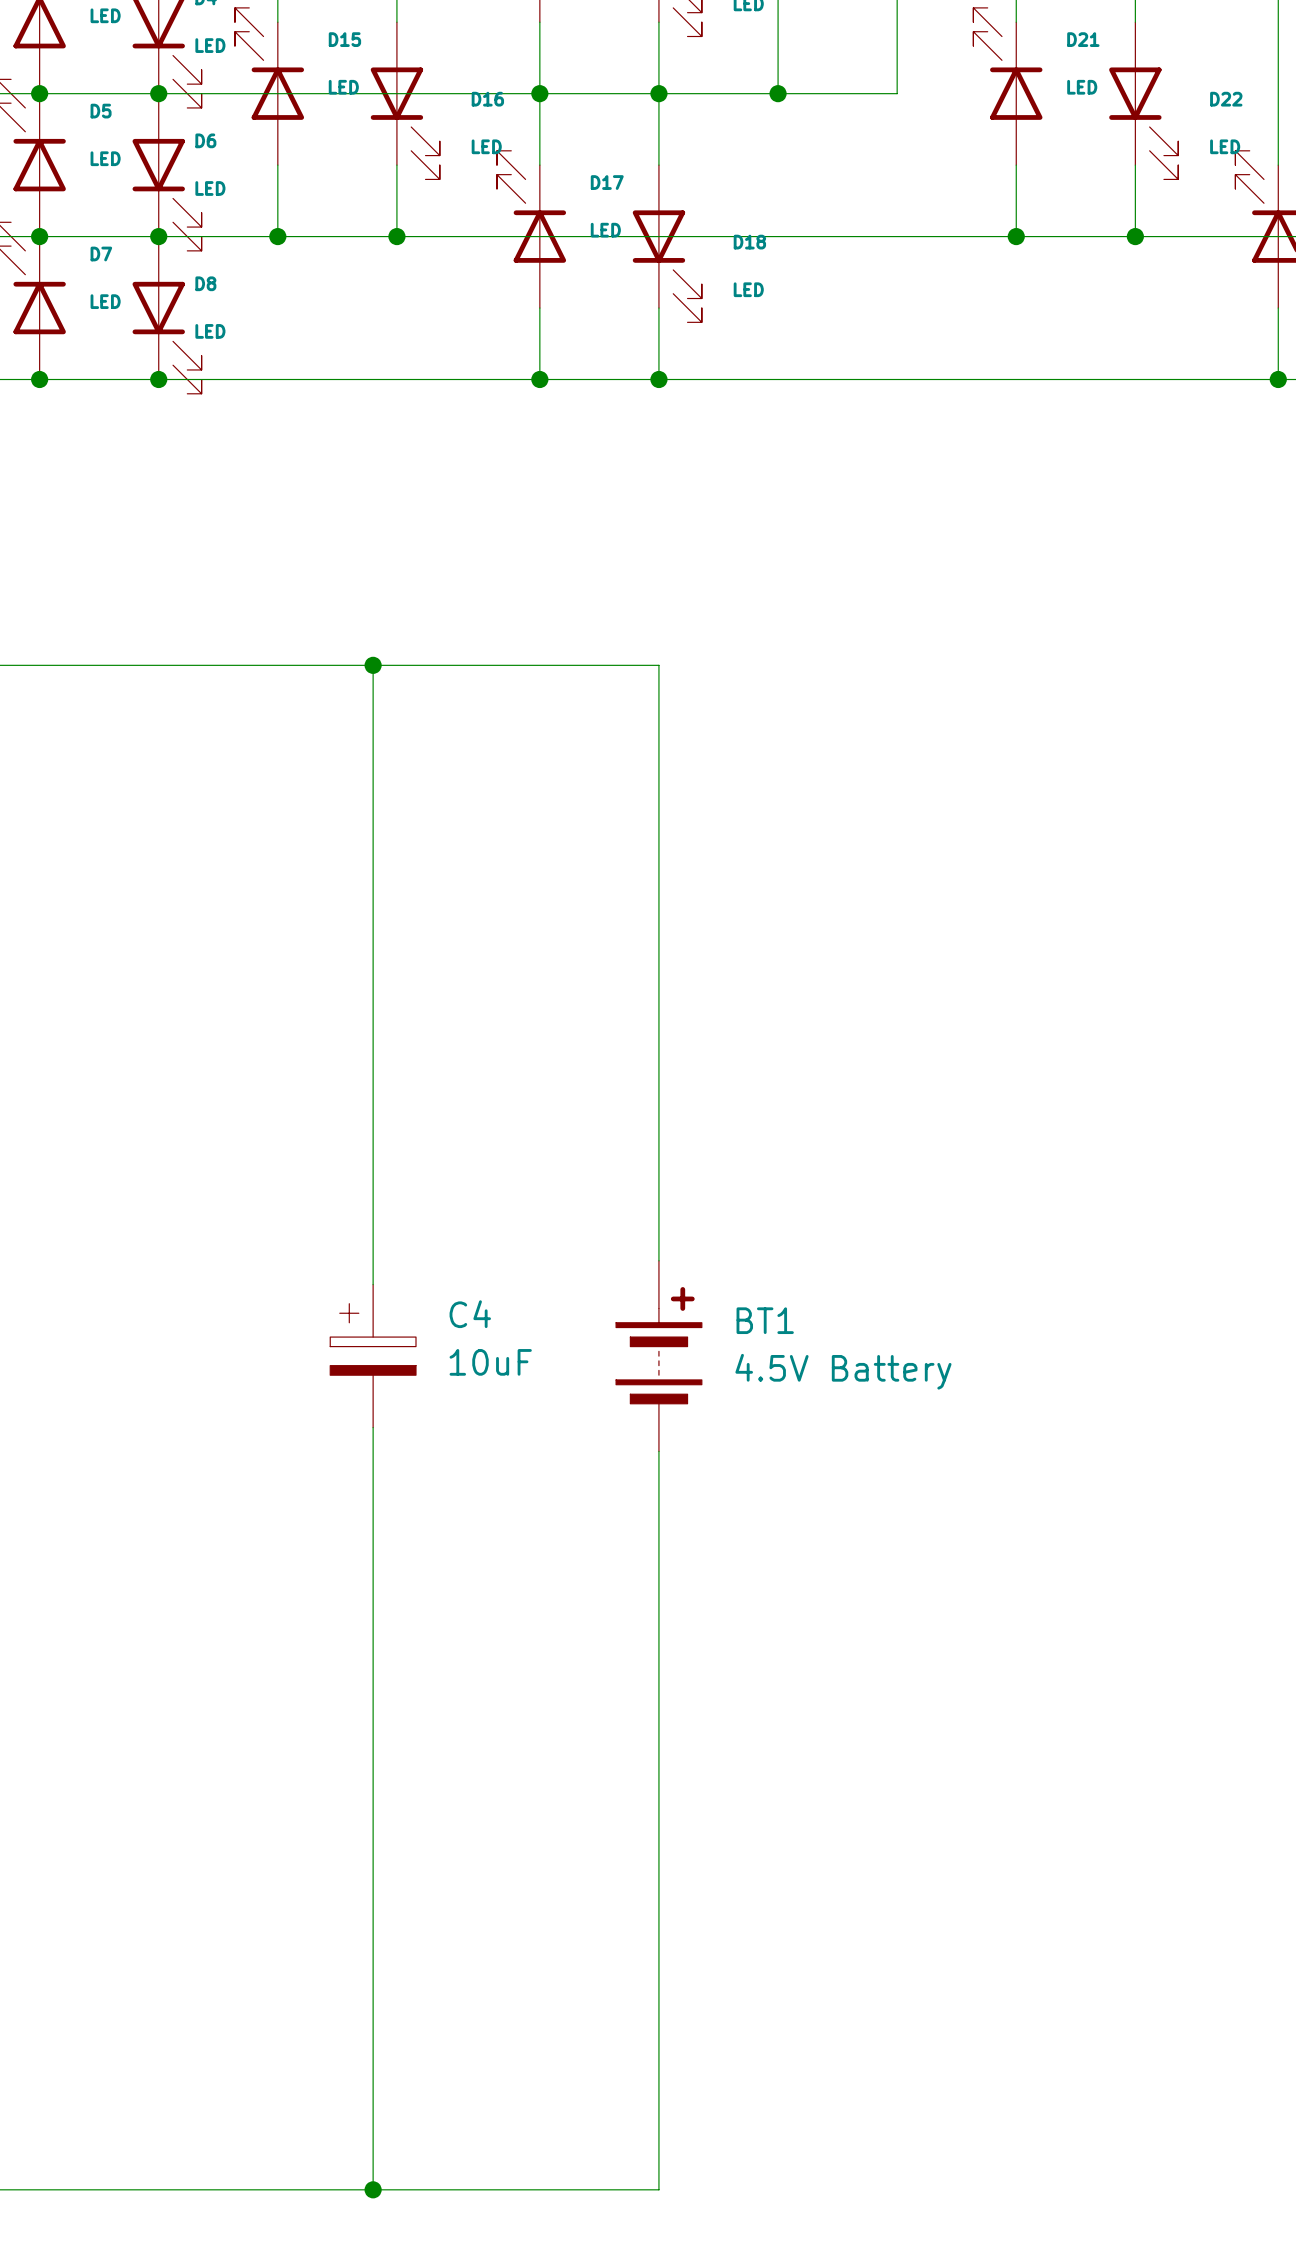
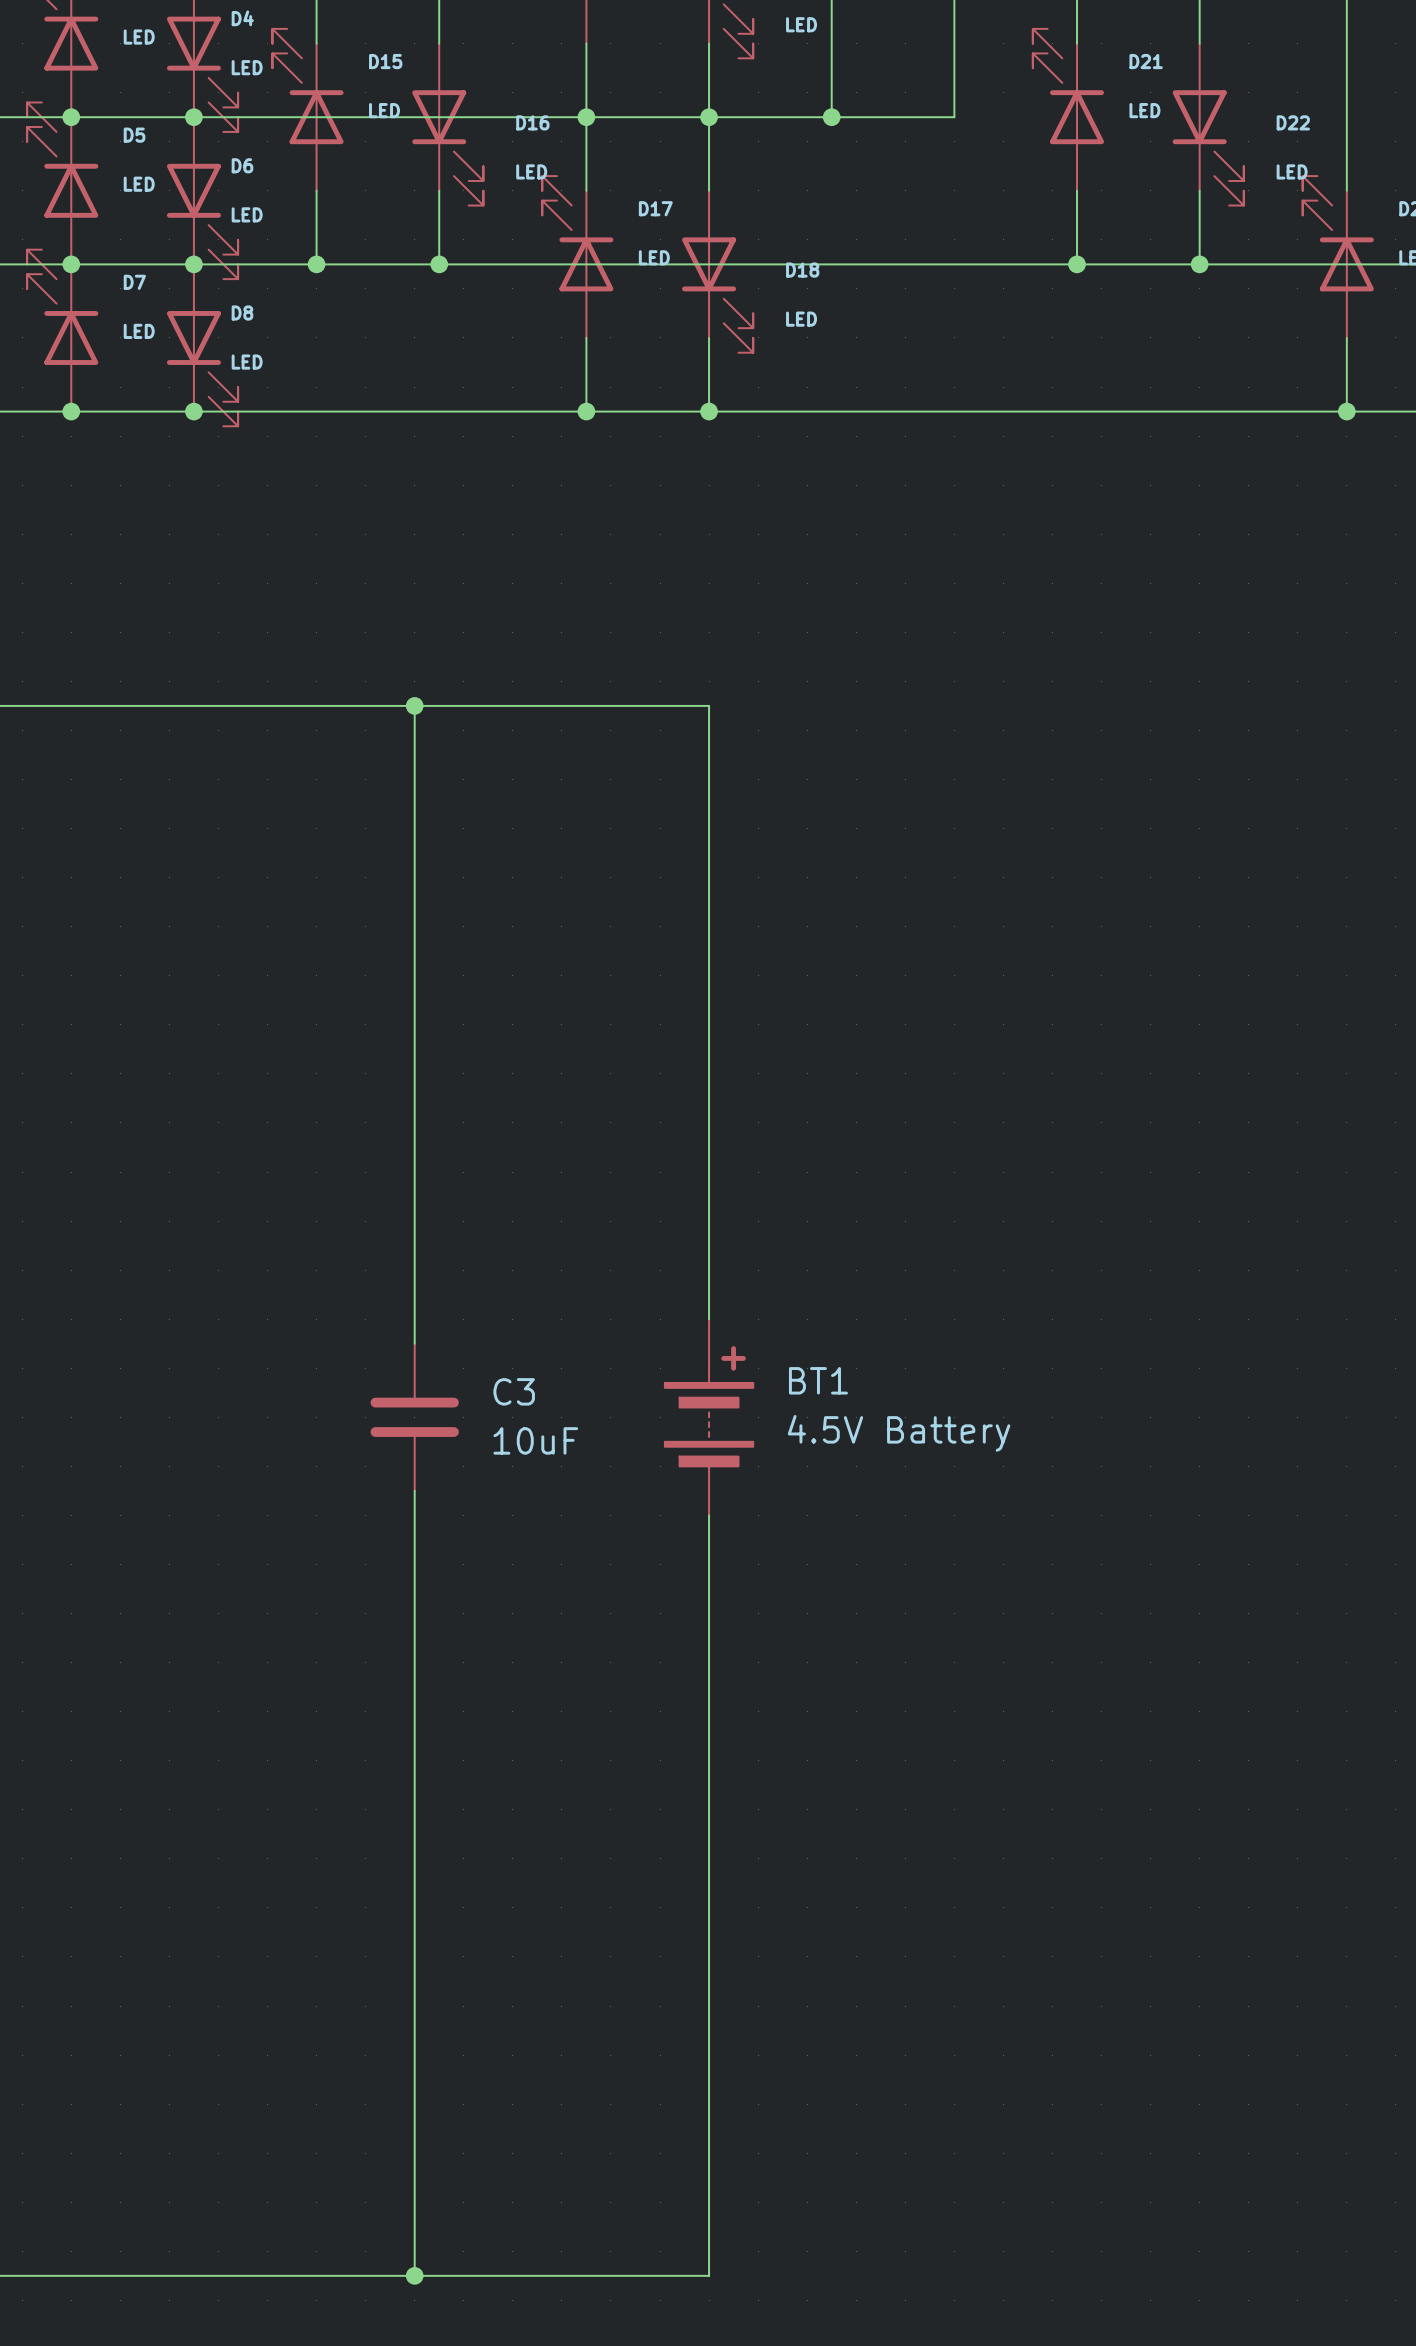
C4: 10uF (373, 1356) -> none
C3: none -> 10uF (414, 1417)

